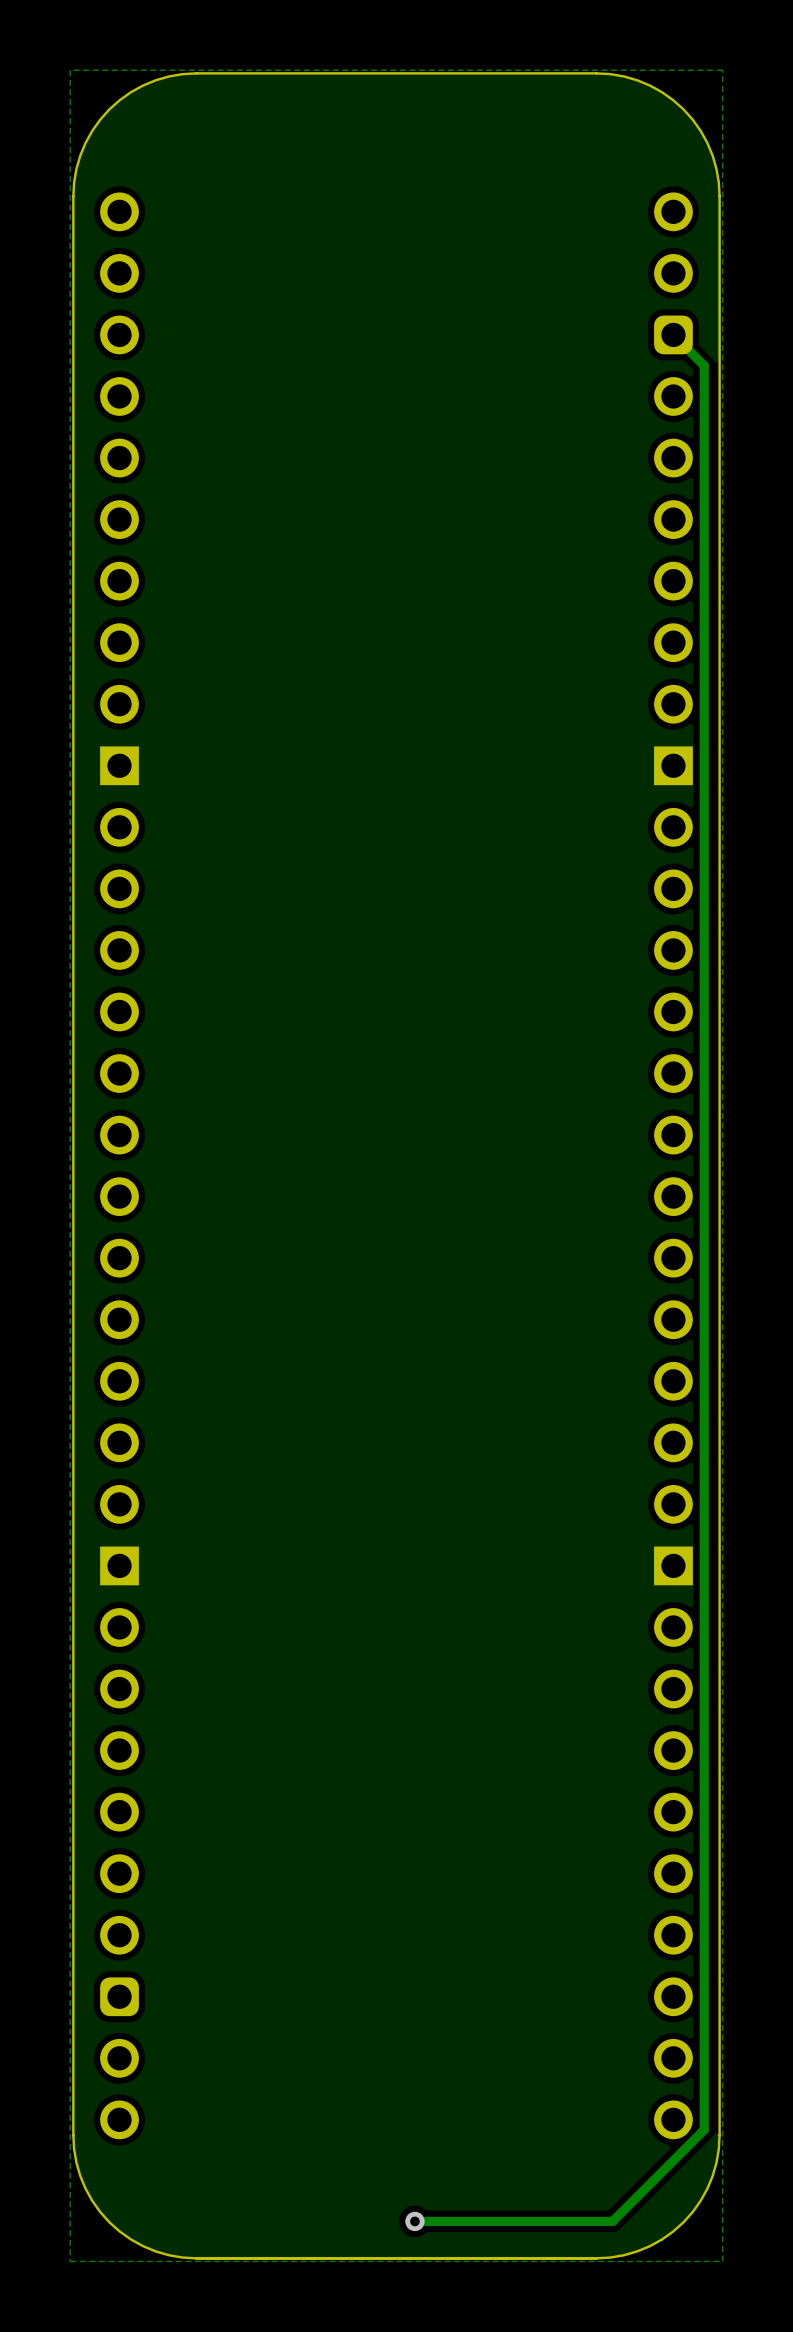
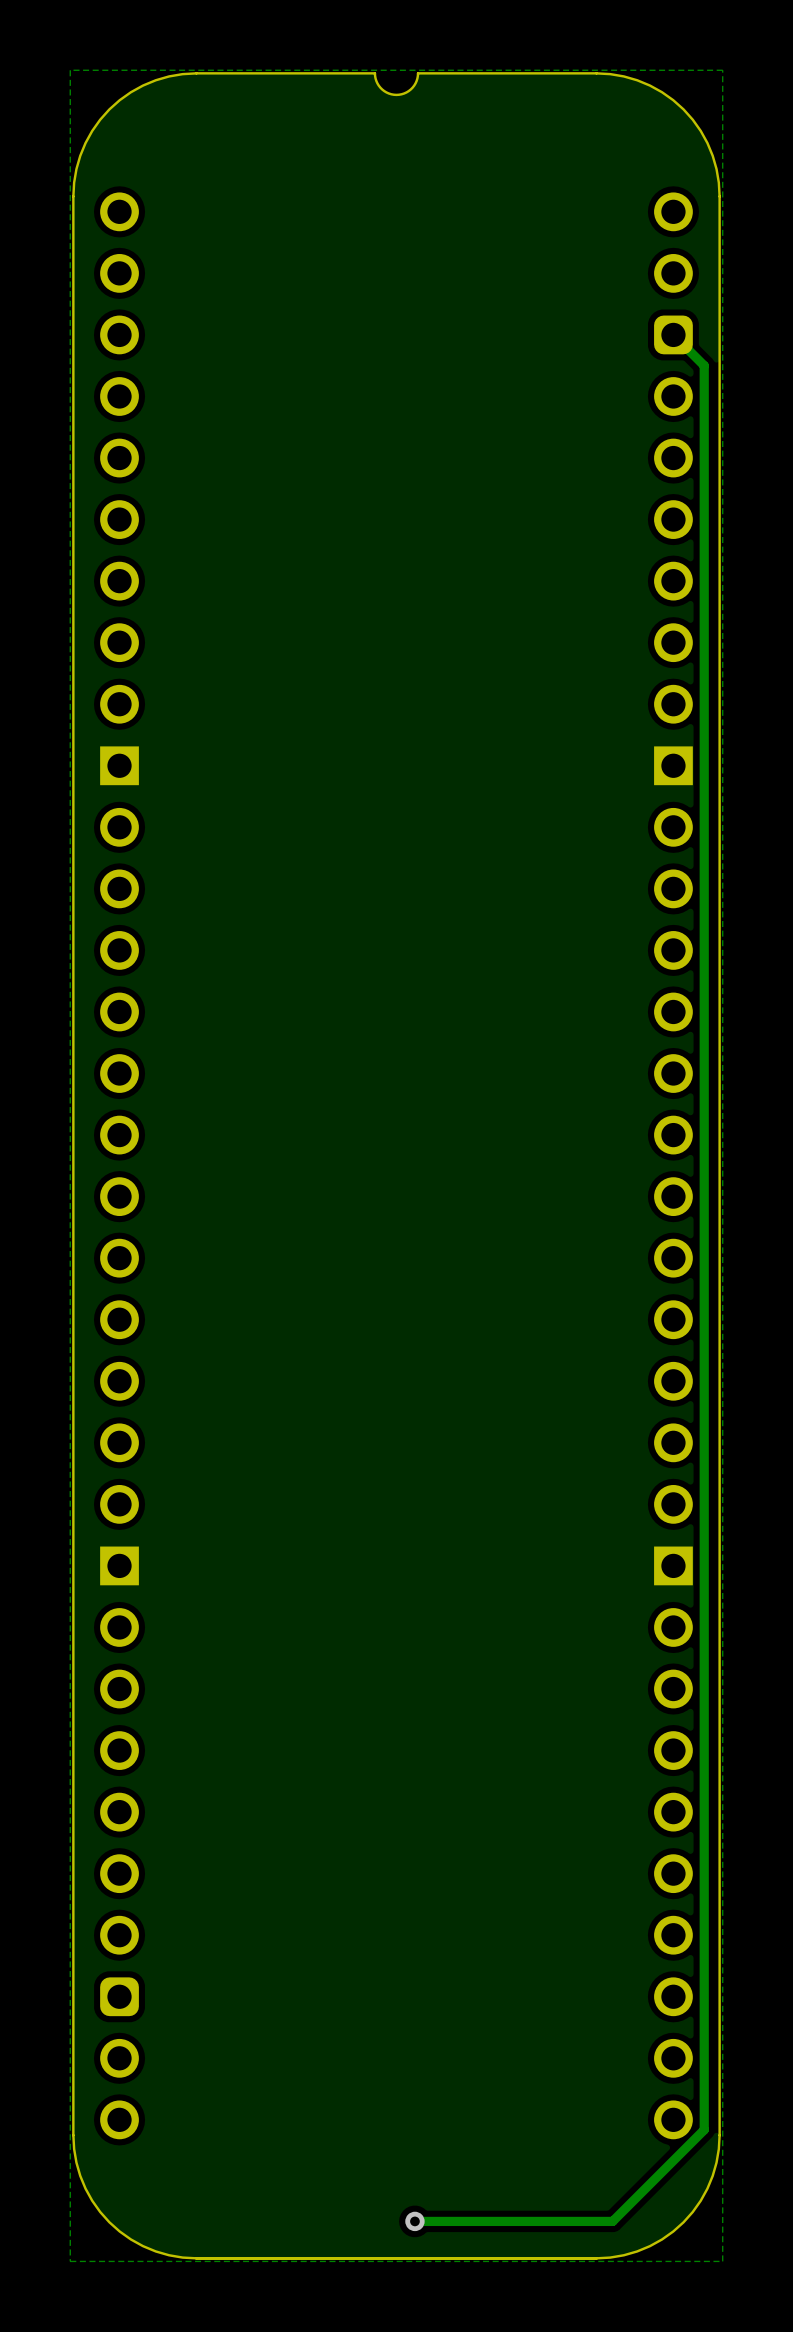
part footprint: [72, 72, 721, 2260] -> [72, 72, 721, 2260]

